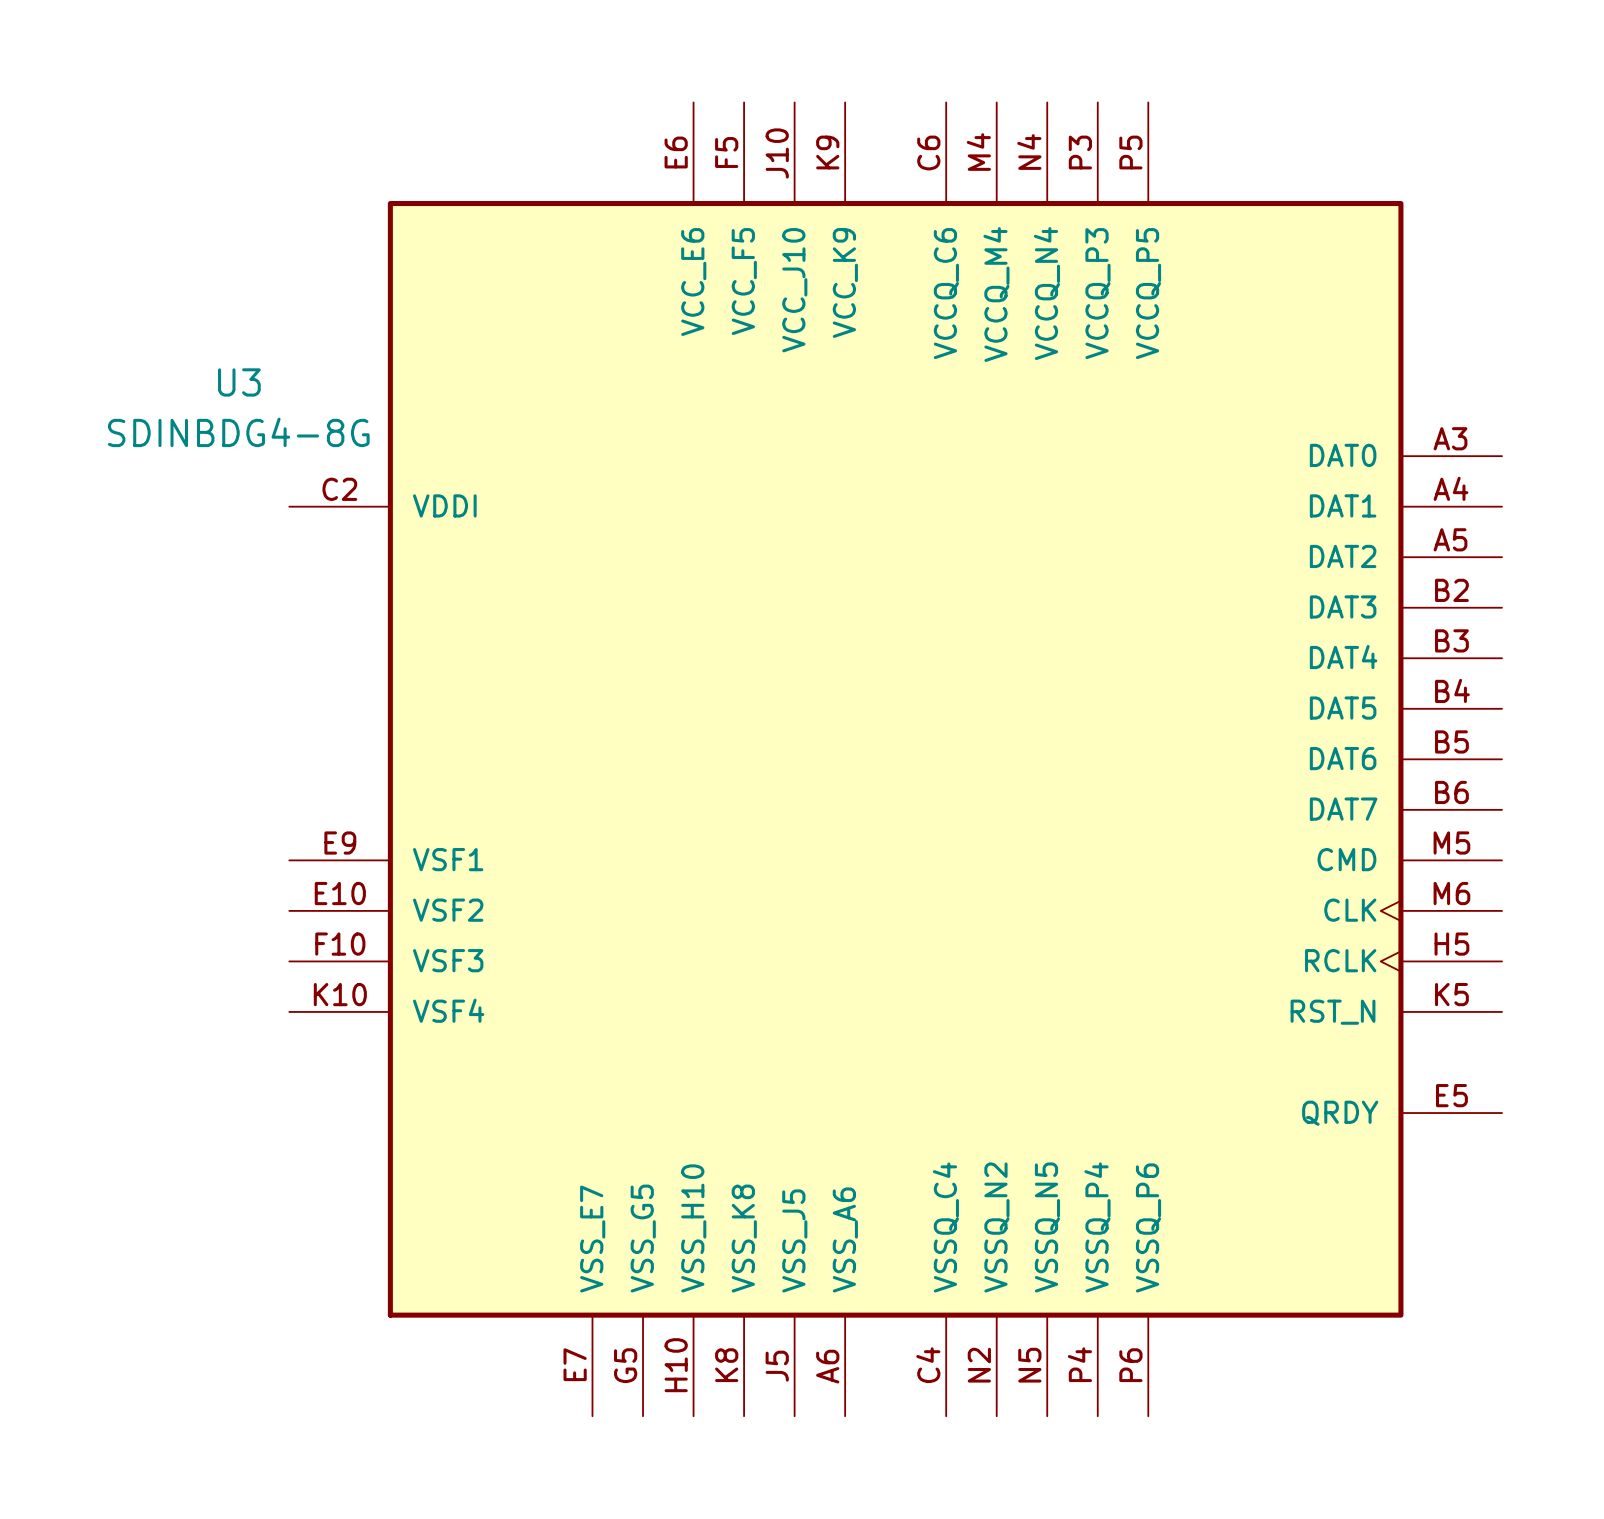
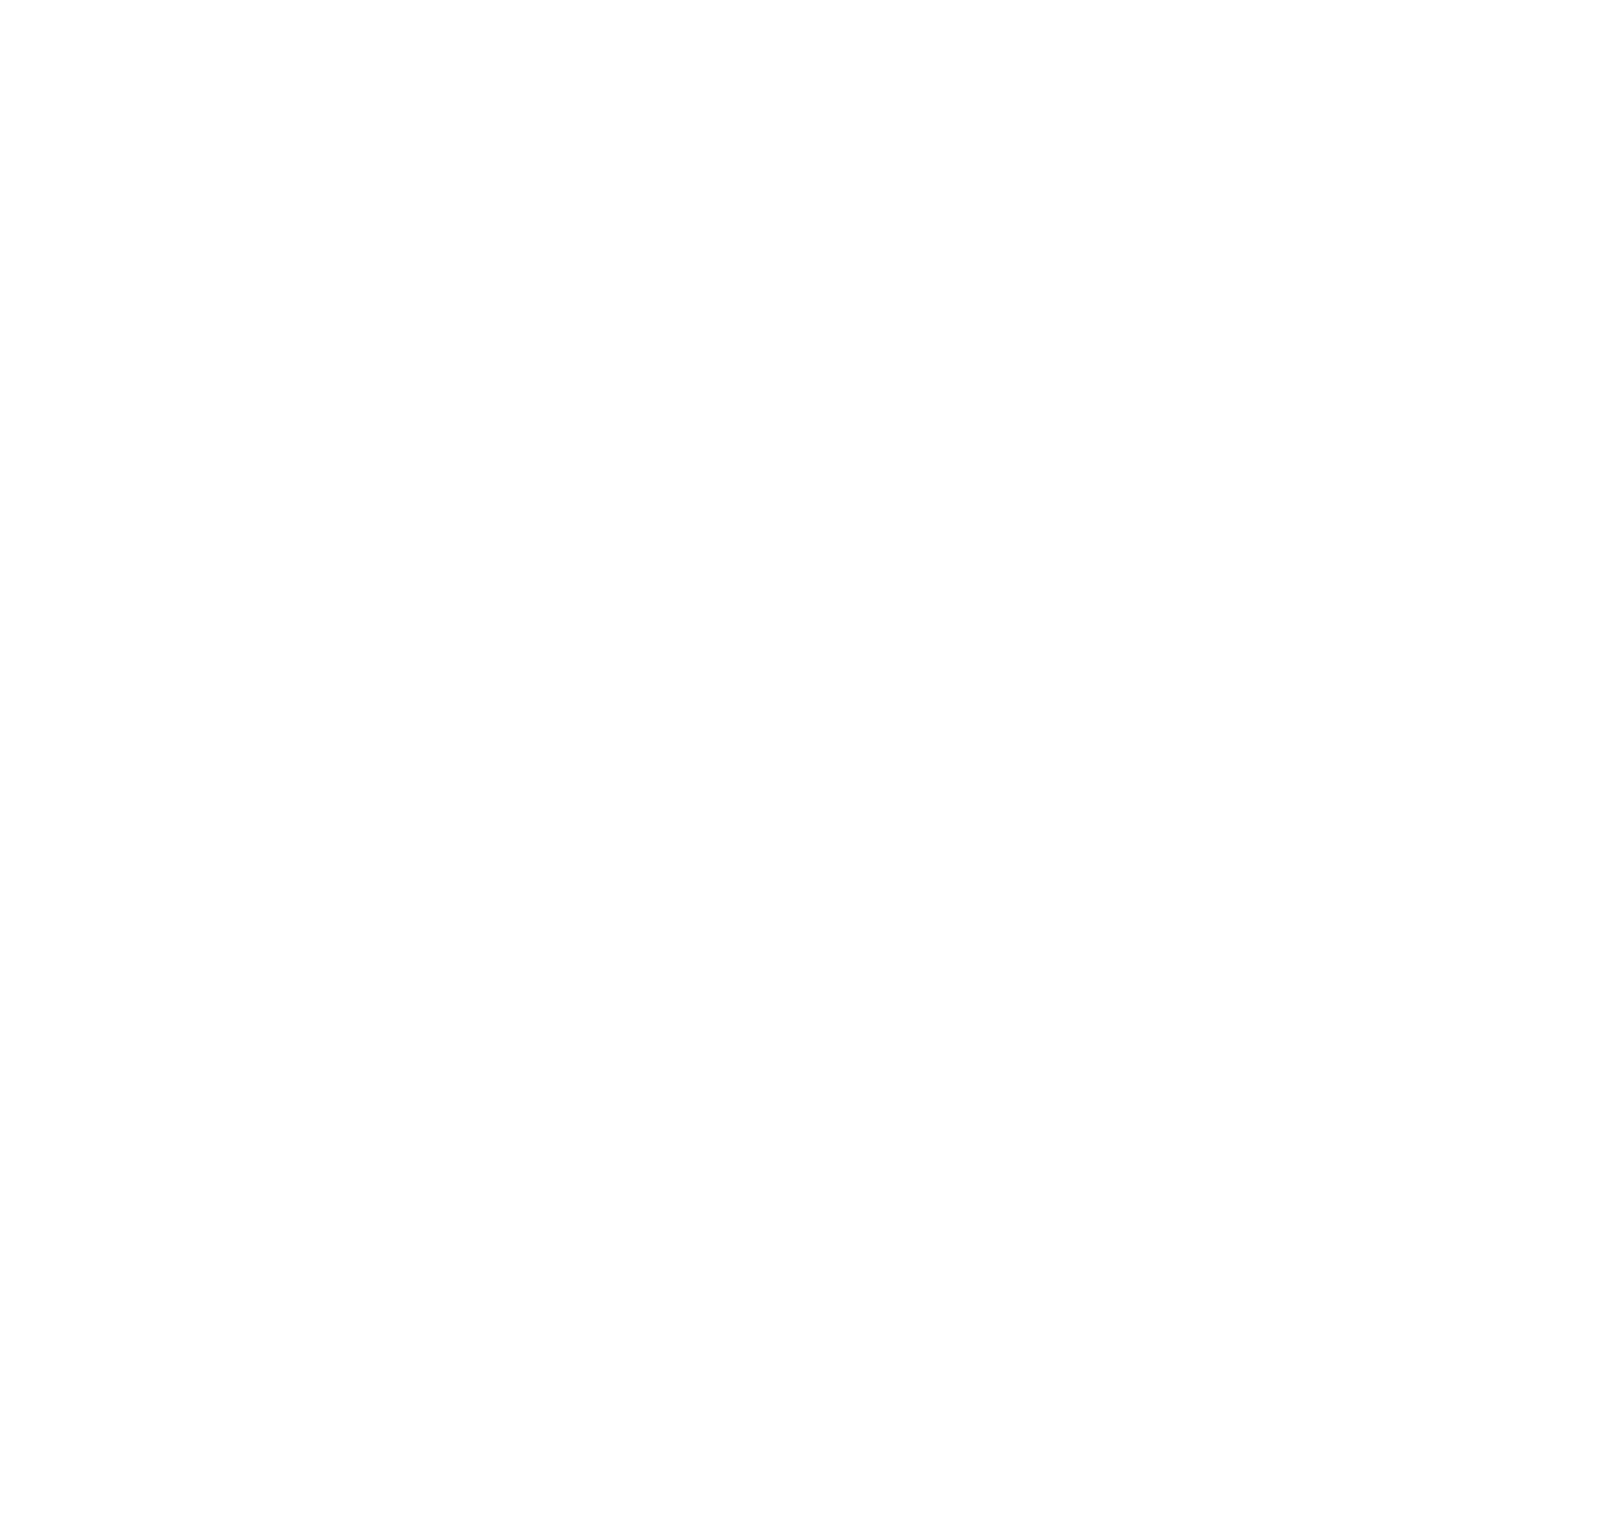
U3: SDINBDG4-8G (895, 759) -> none

